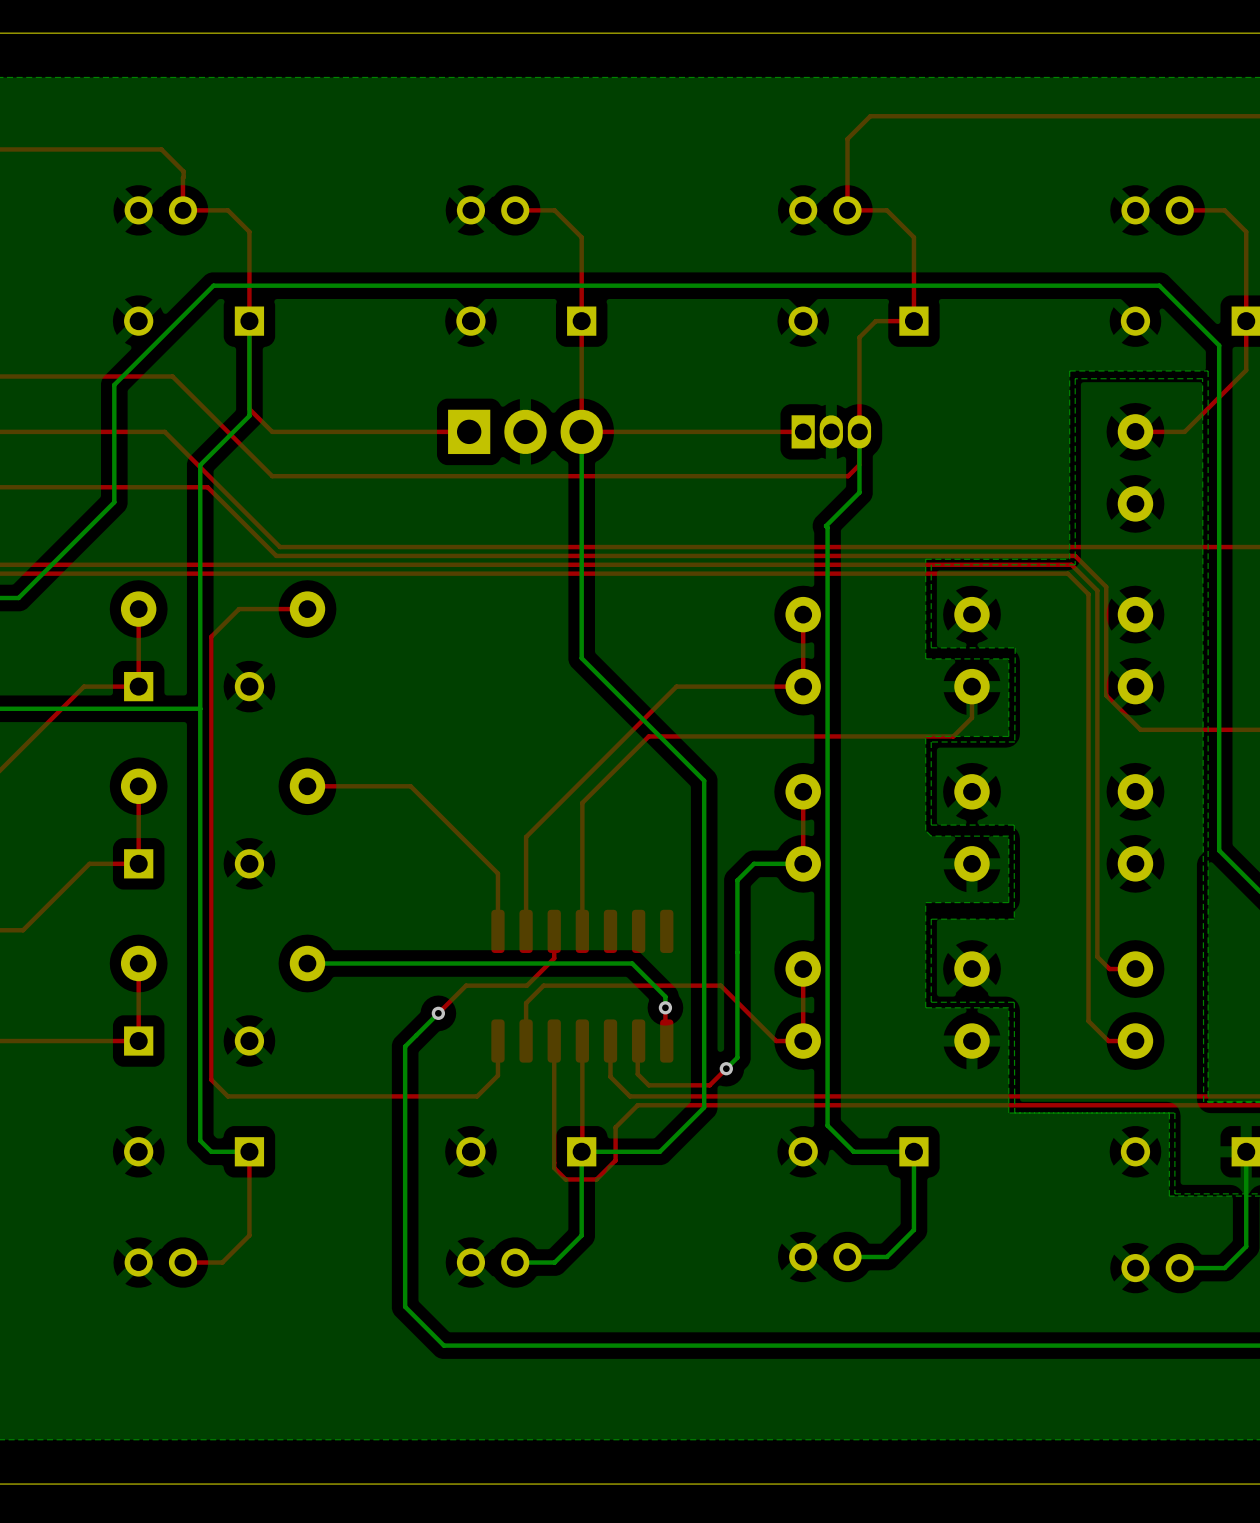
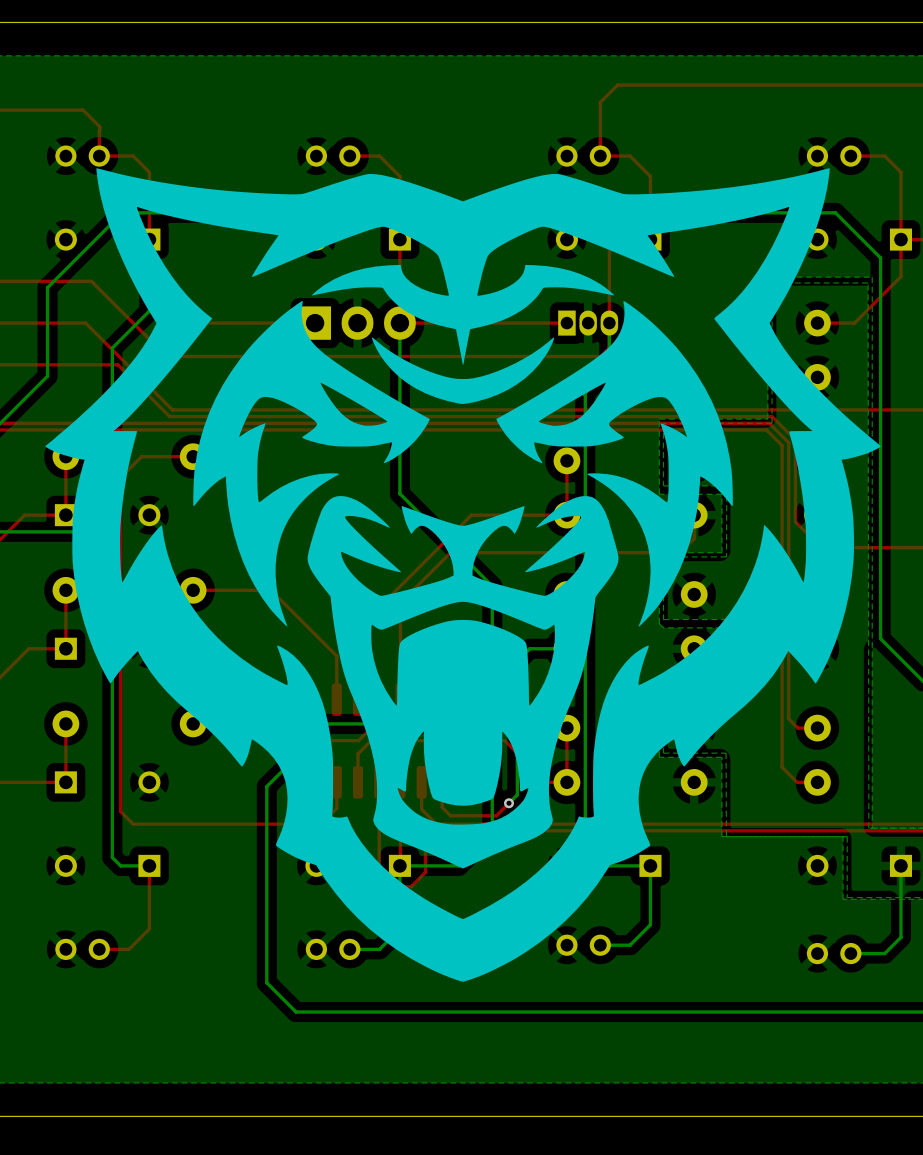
drawing: none -> [45, 168, 881, 982]

